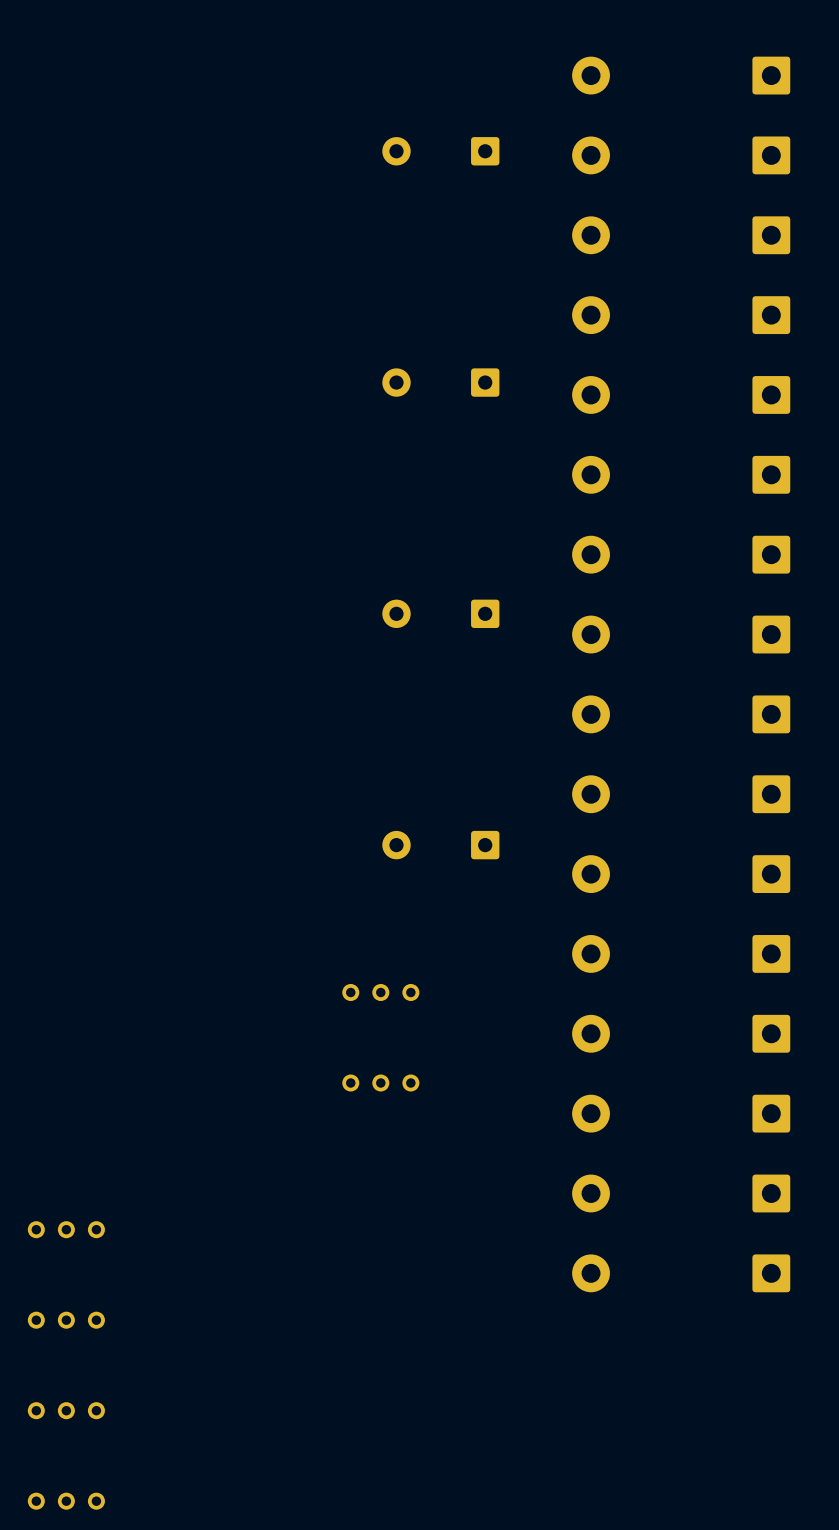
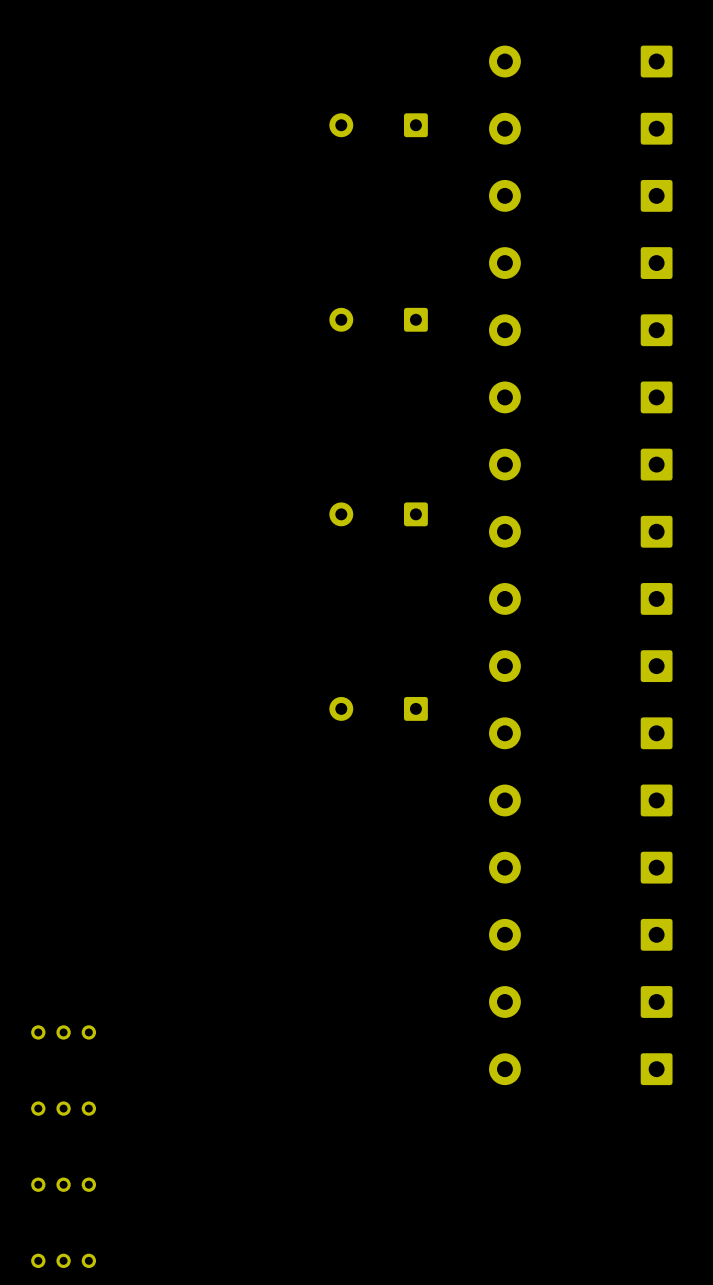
part: (380, 992) -> none
part: (380, 1083) -> none

